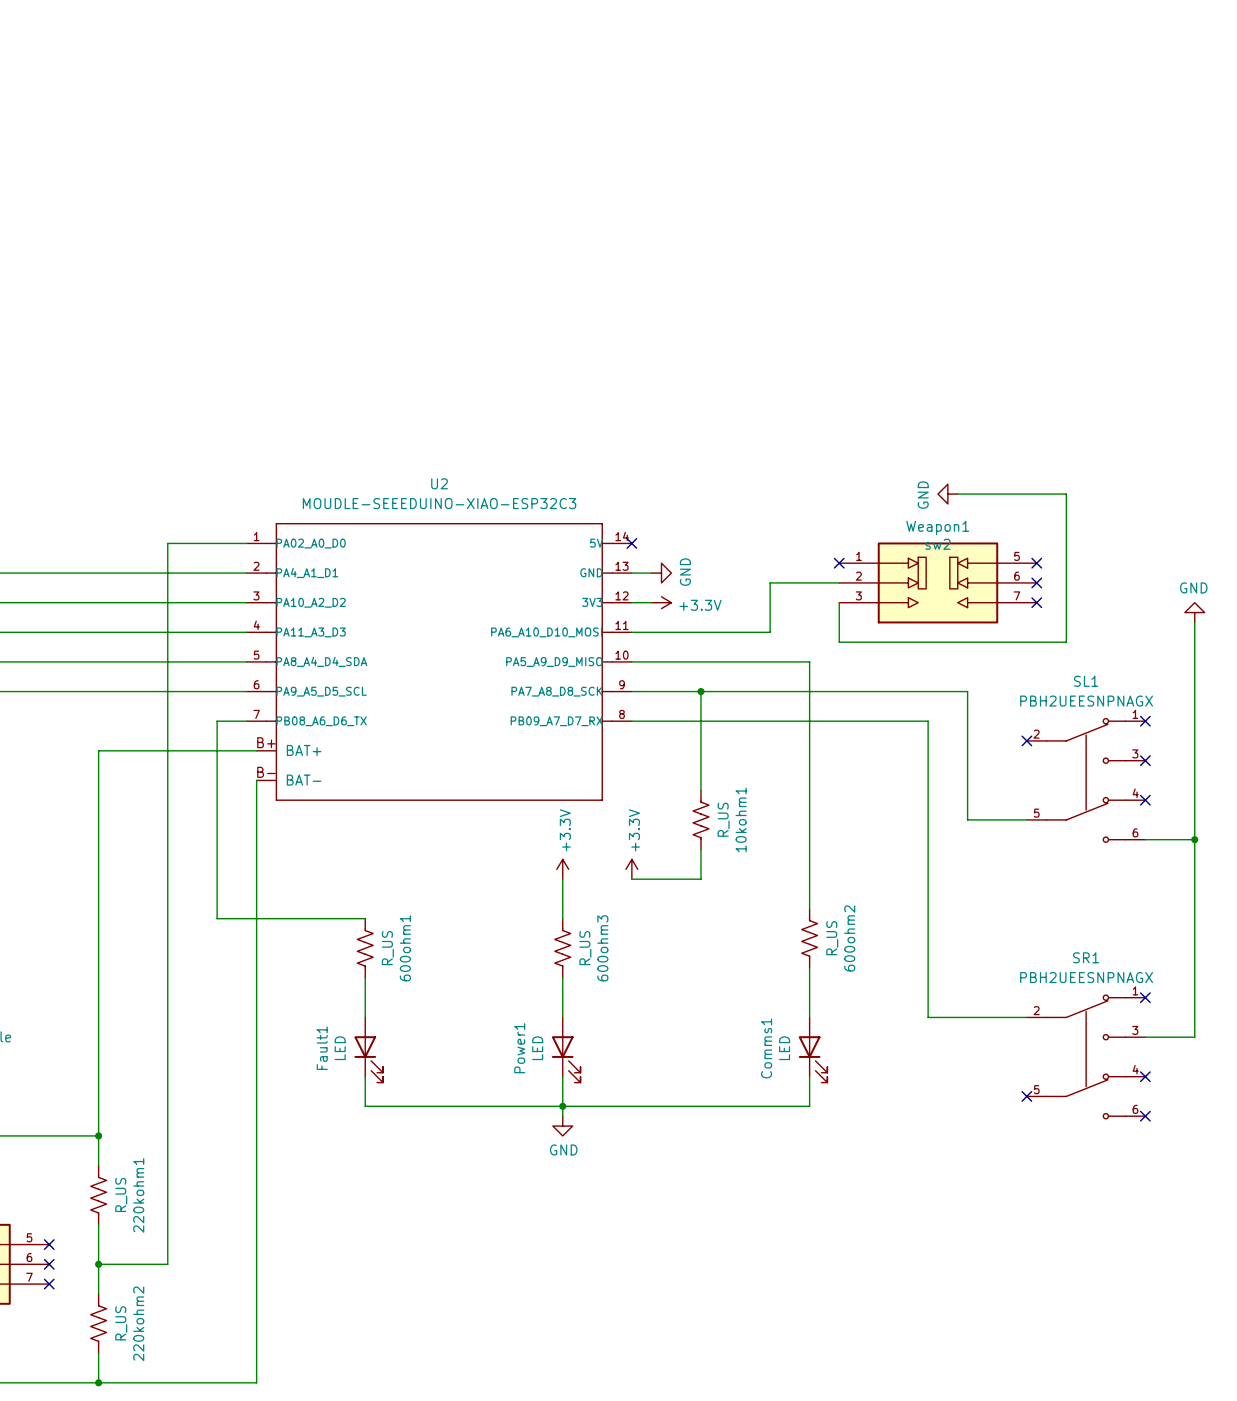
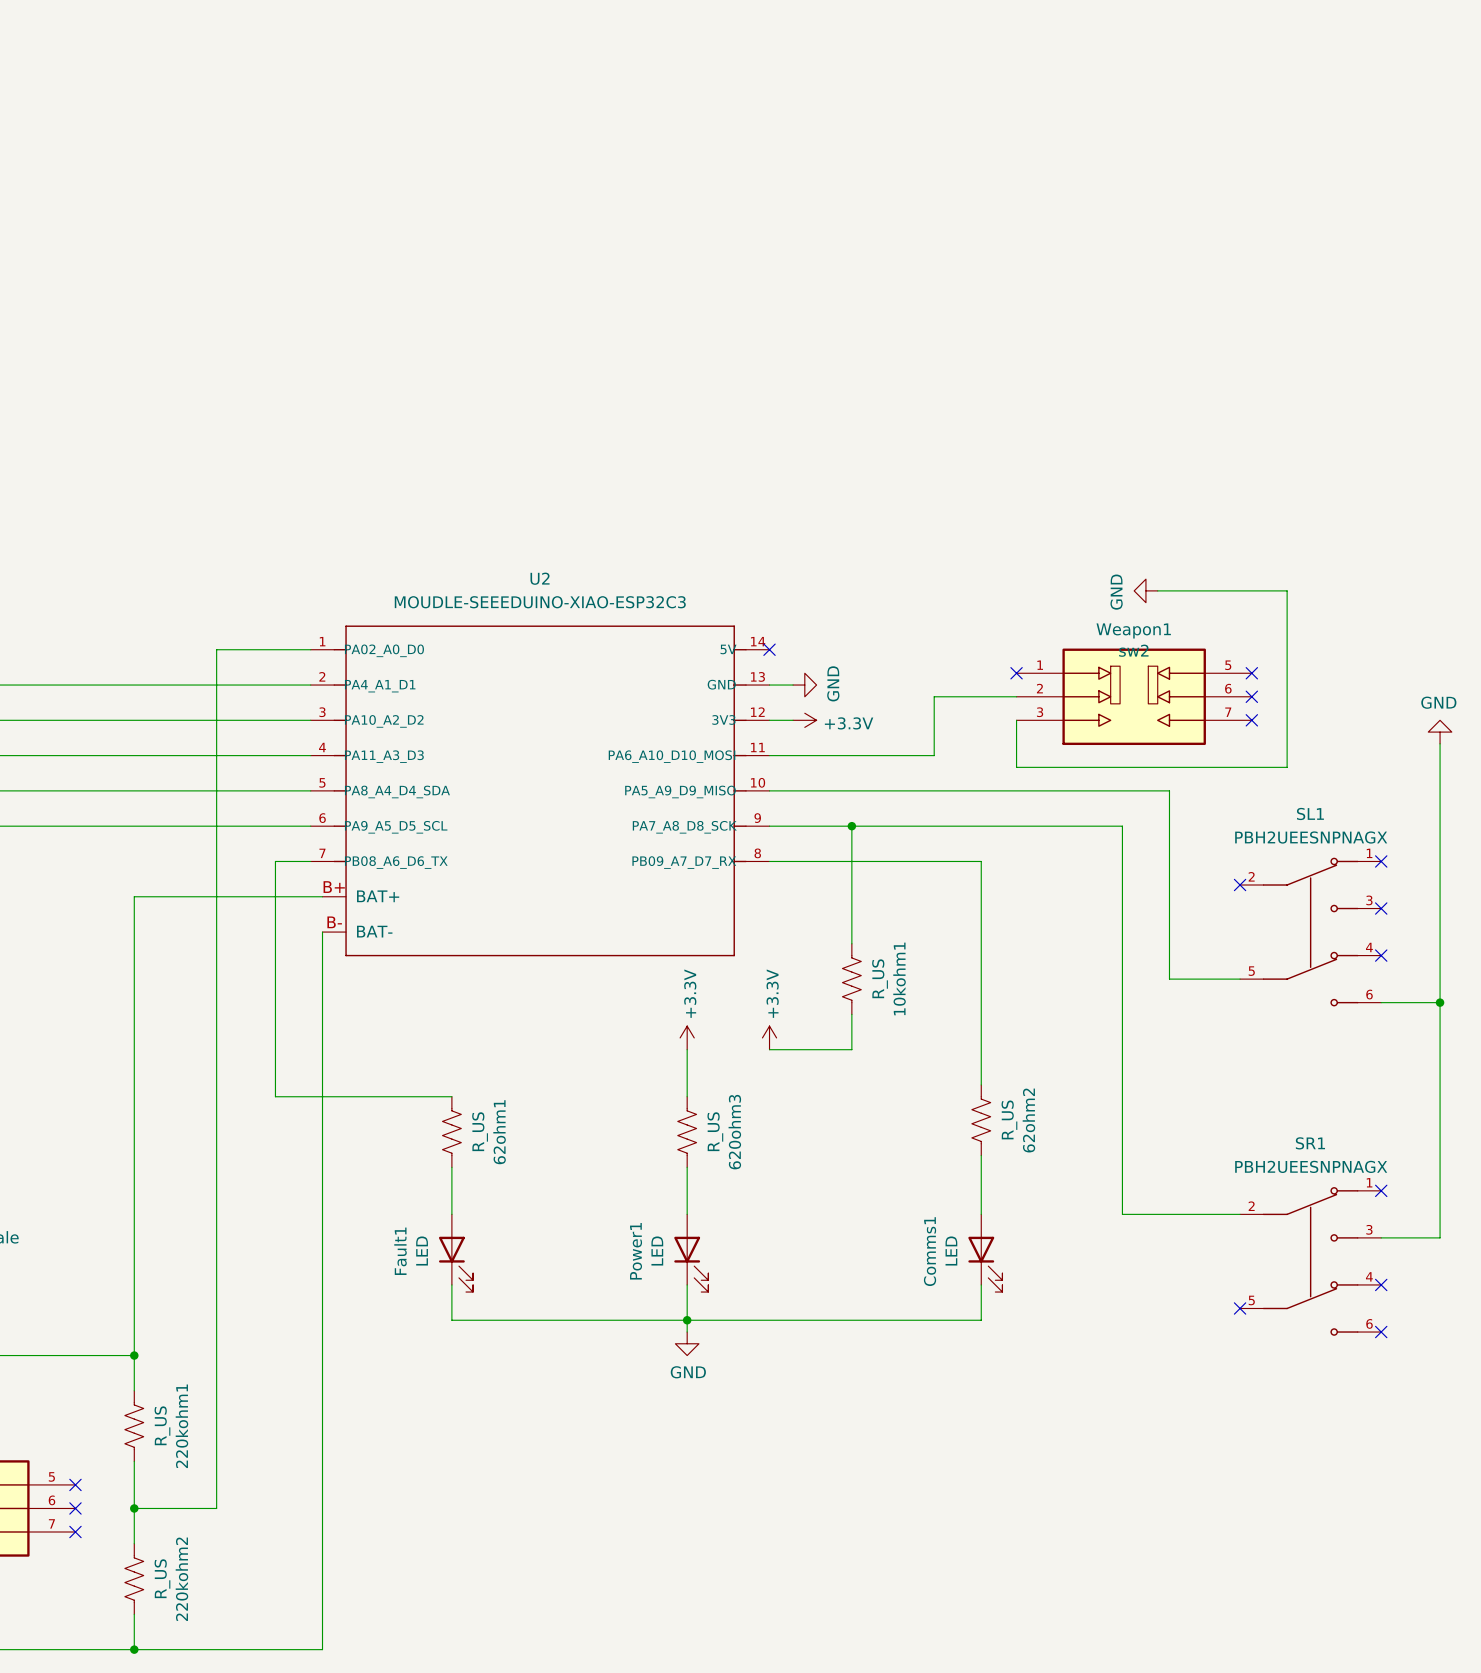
wire: (809, 661) (809, 721) (928, 721) -> (981, 790) (1169, 790) (1169, 826)
wire: (928, 691) (967, 691) -> (1122, 826) (1122, 861)
600ohm2 name: 600ohm2 (849, 938) -> 62ohm2 (1028, 1120)
600ohm1 name: 600ohm1 (405, 948) -> 62ohm1 (499, 1132)
600ohm3 name: 600ohm3 (602, 948) -> 620ohm3 (734, 1132)

